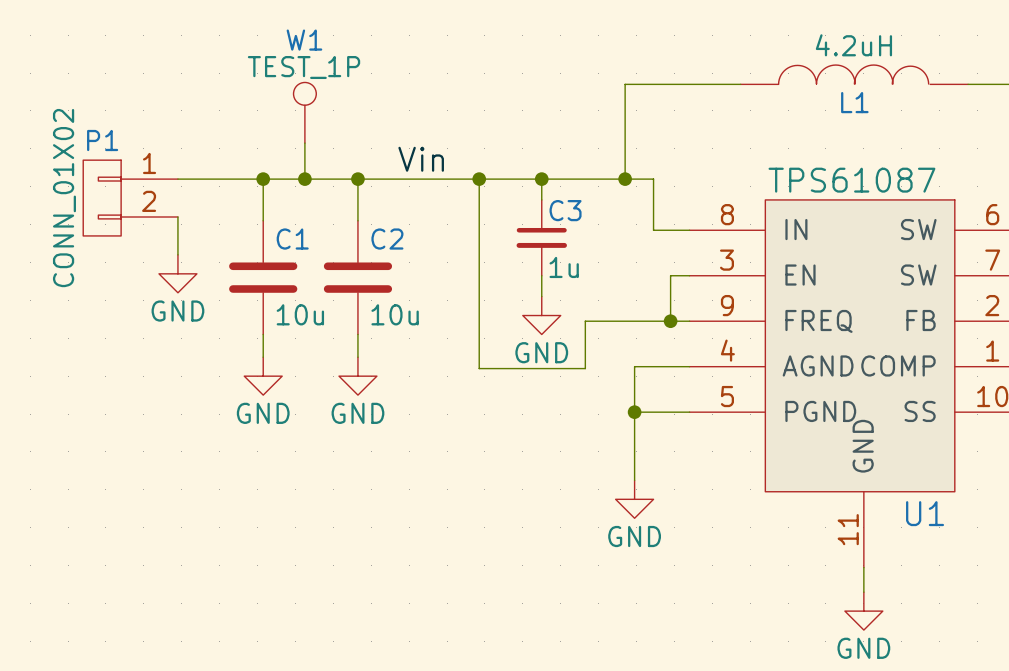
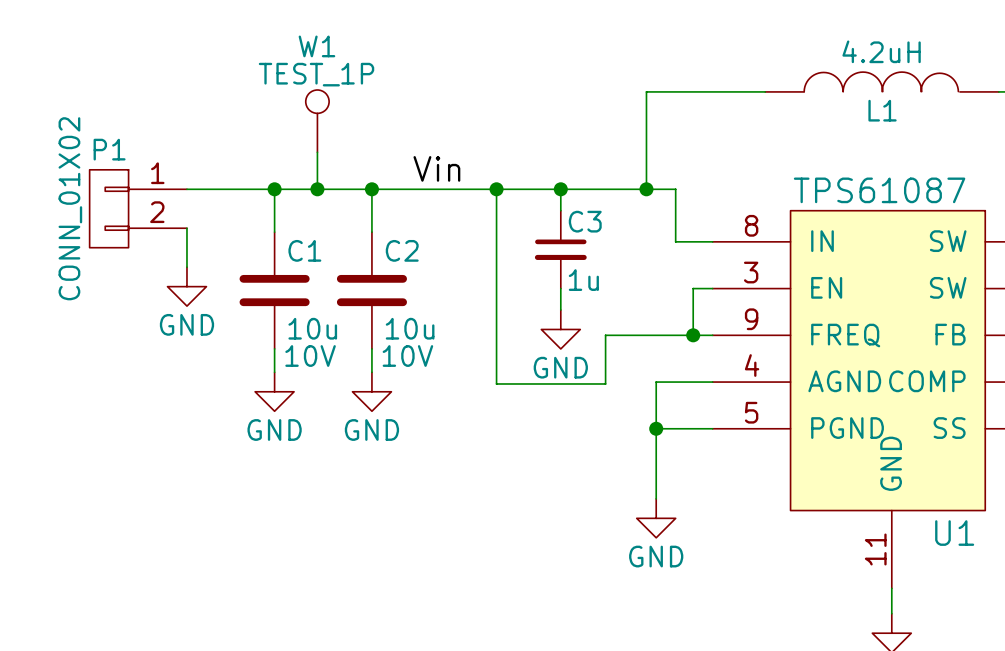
C1 text: none -> 10V (310, 356)
C2 text: none -> 10V (407, 356)

